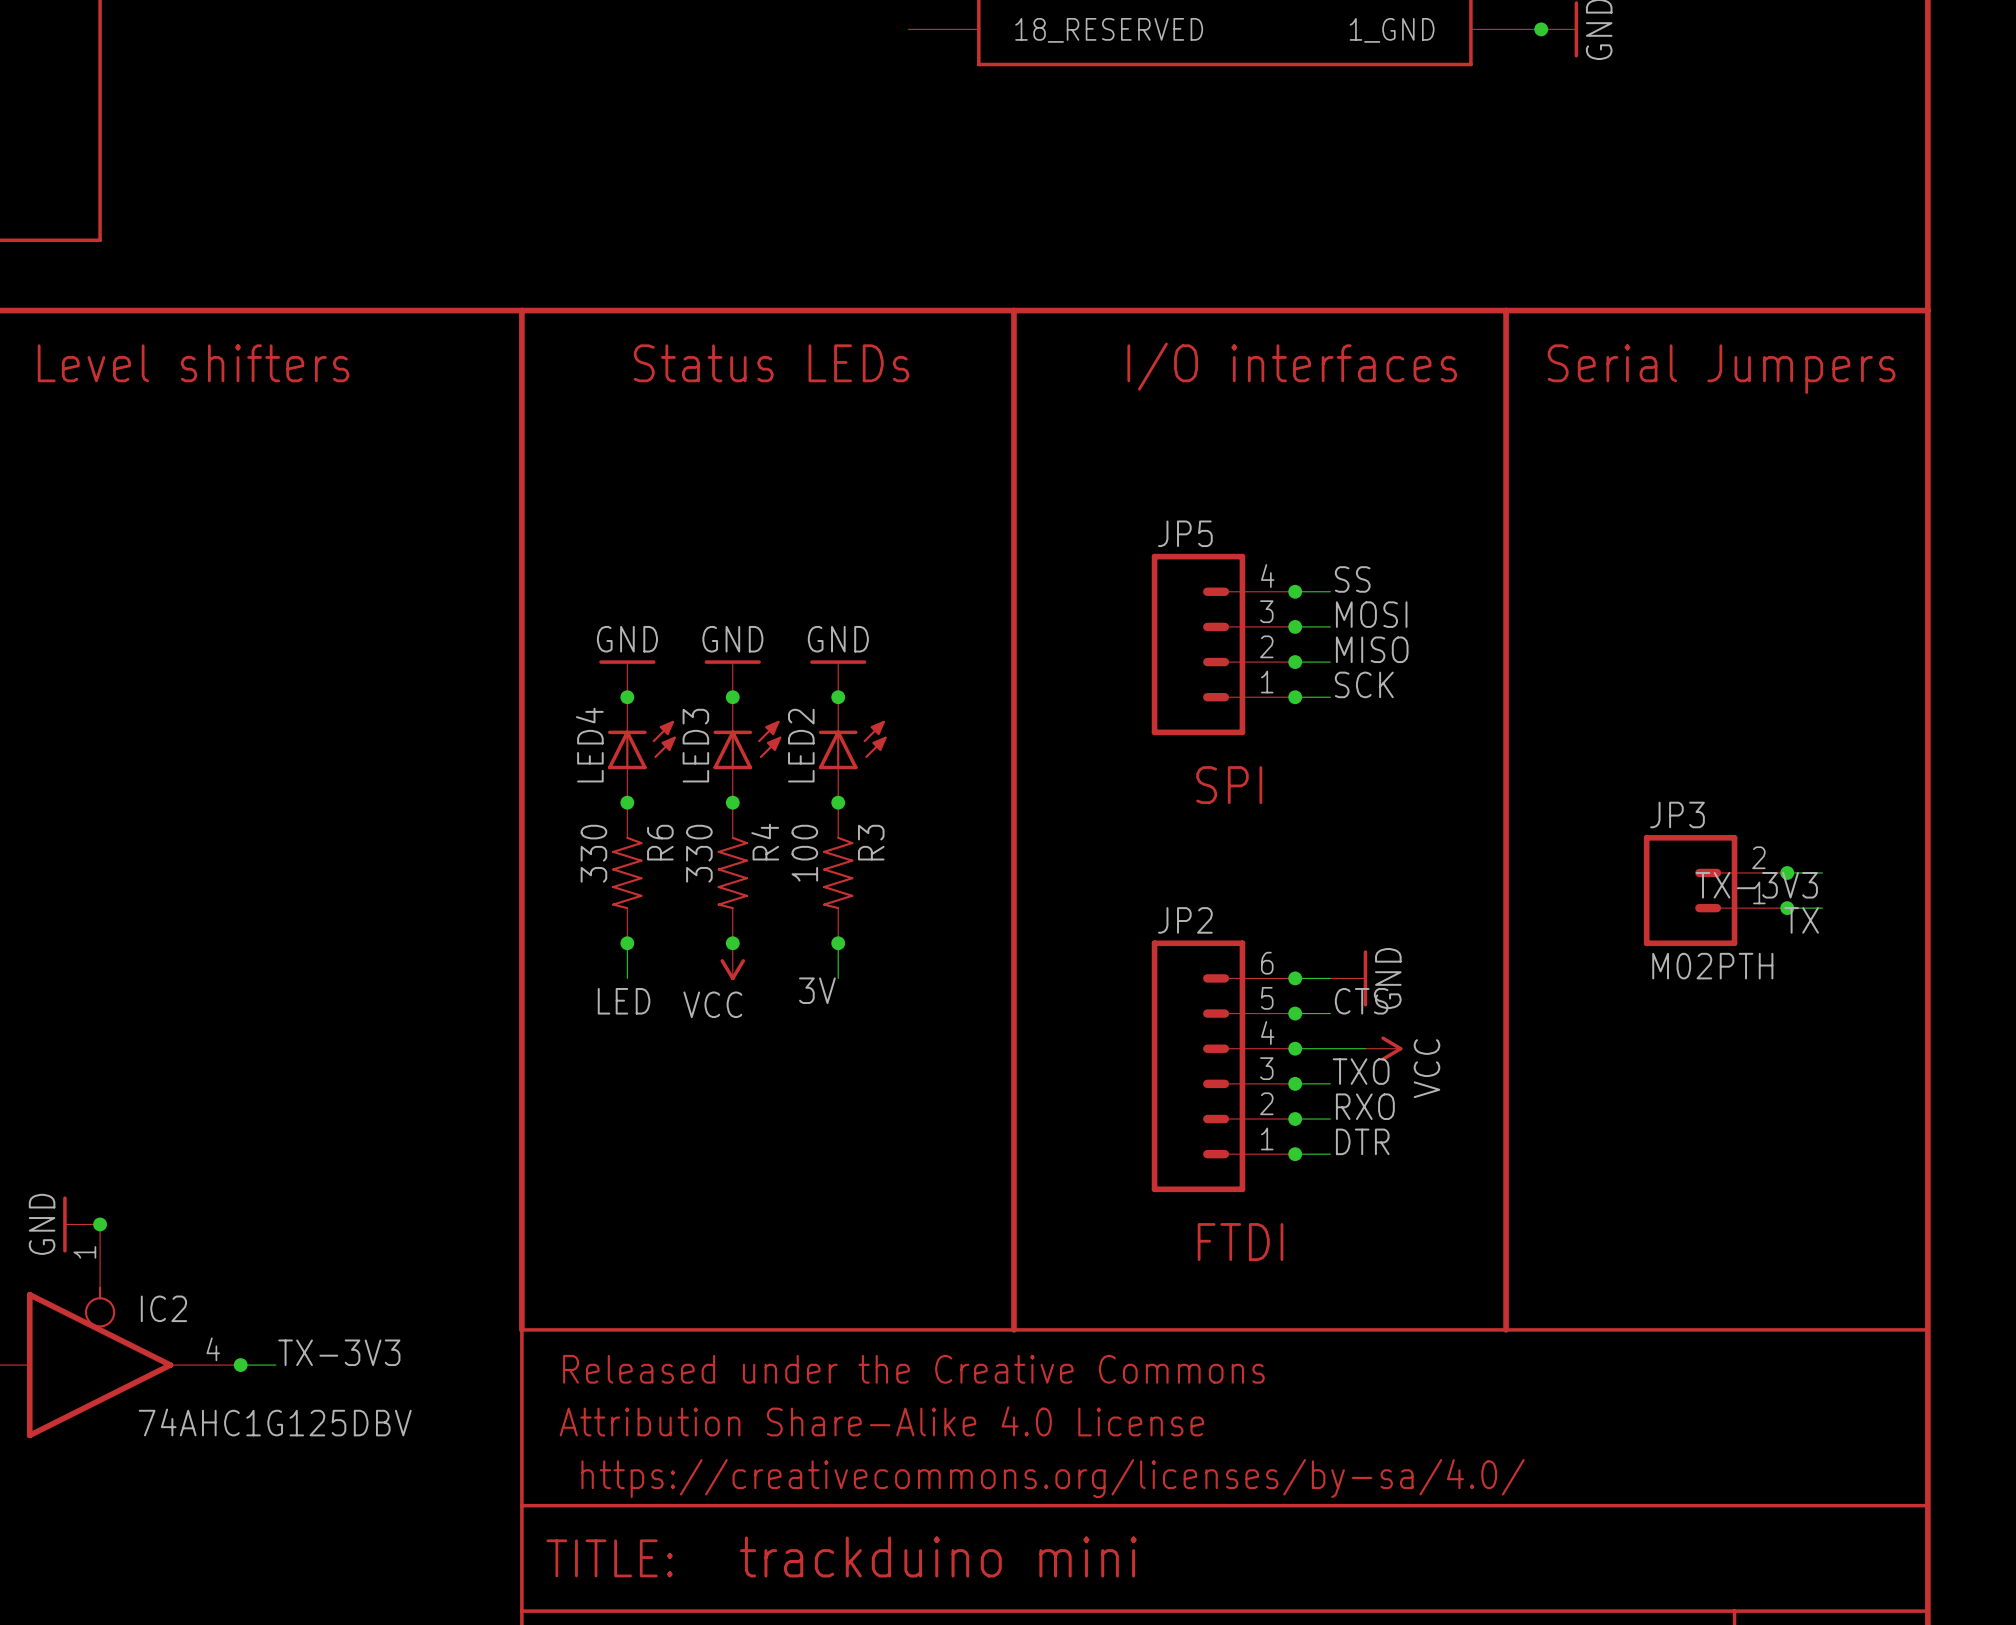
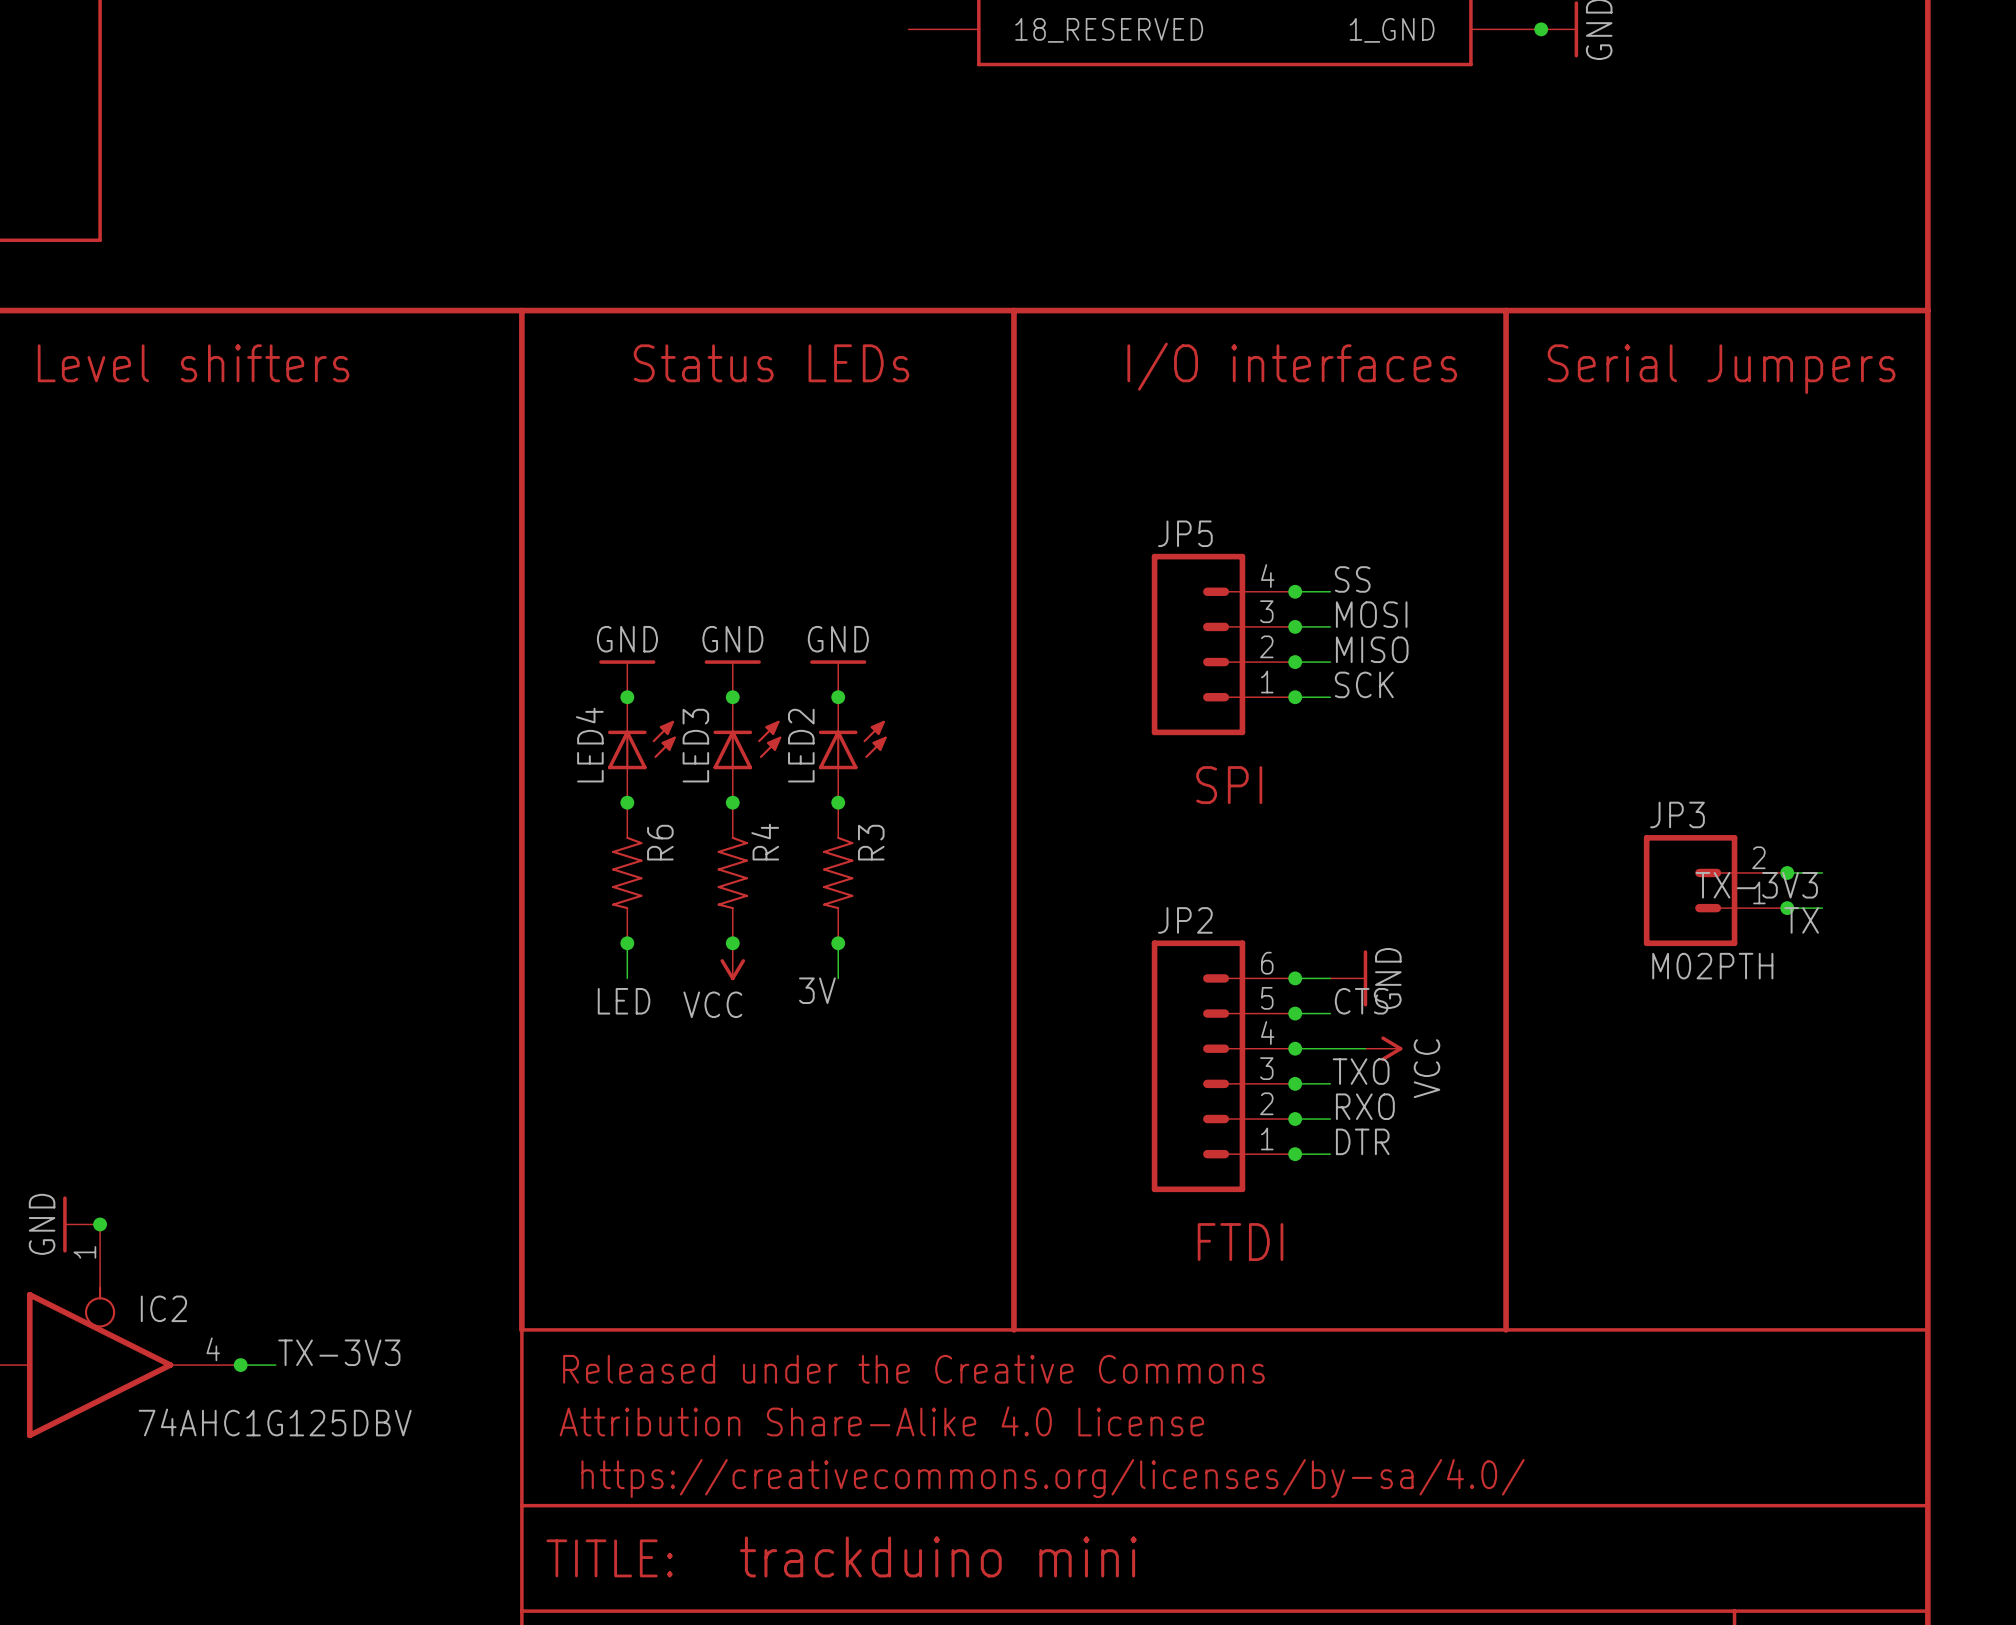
R6 value: 330 (593, 853) -> none
R4 value: 330 (699, 853) -> none
R3 value: 100 (804, 853) -> none

